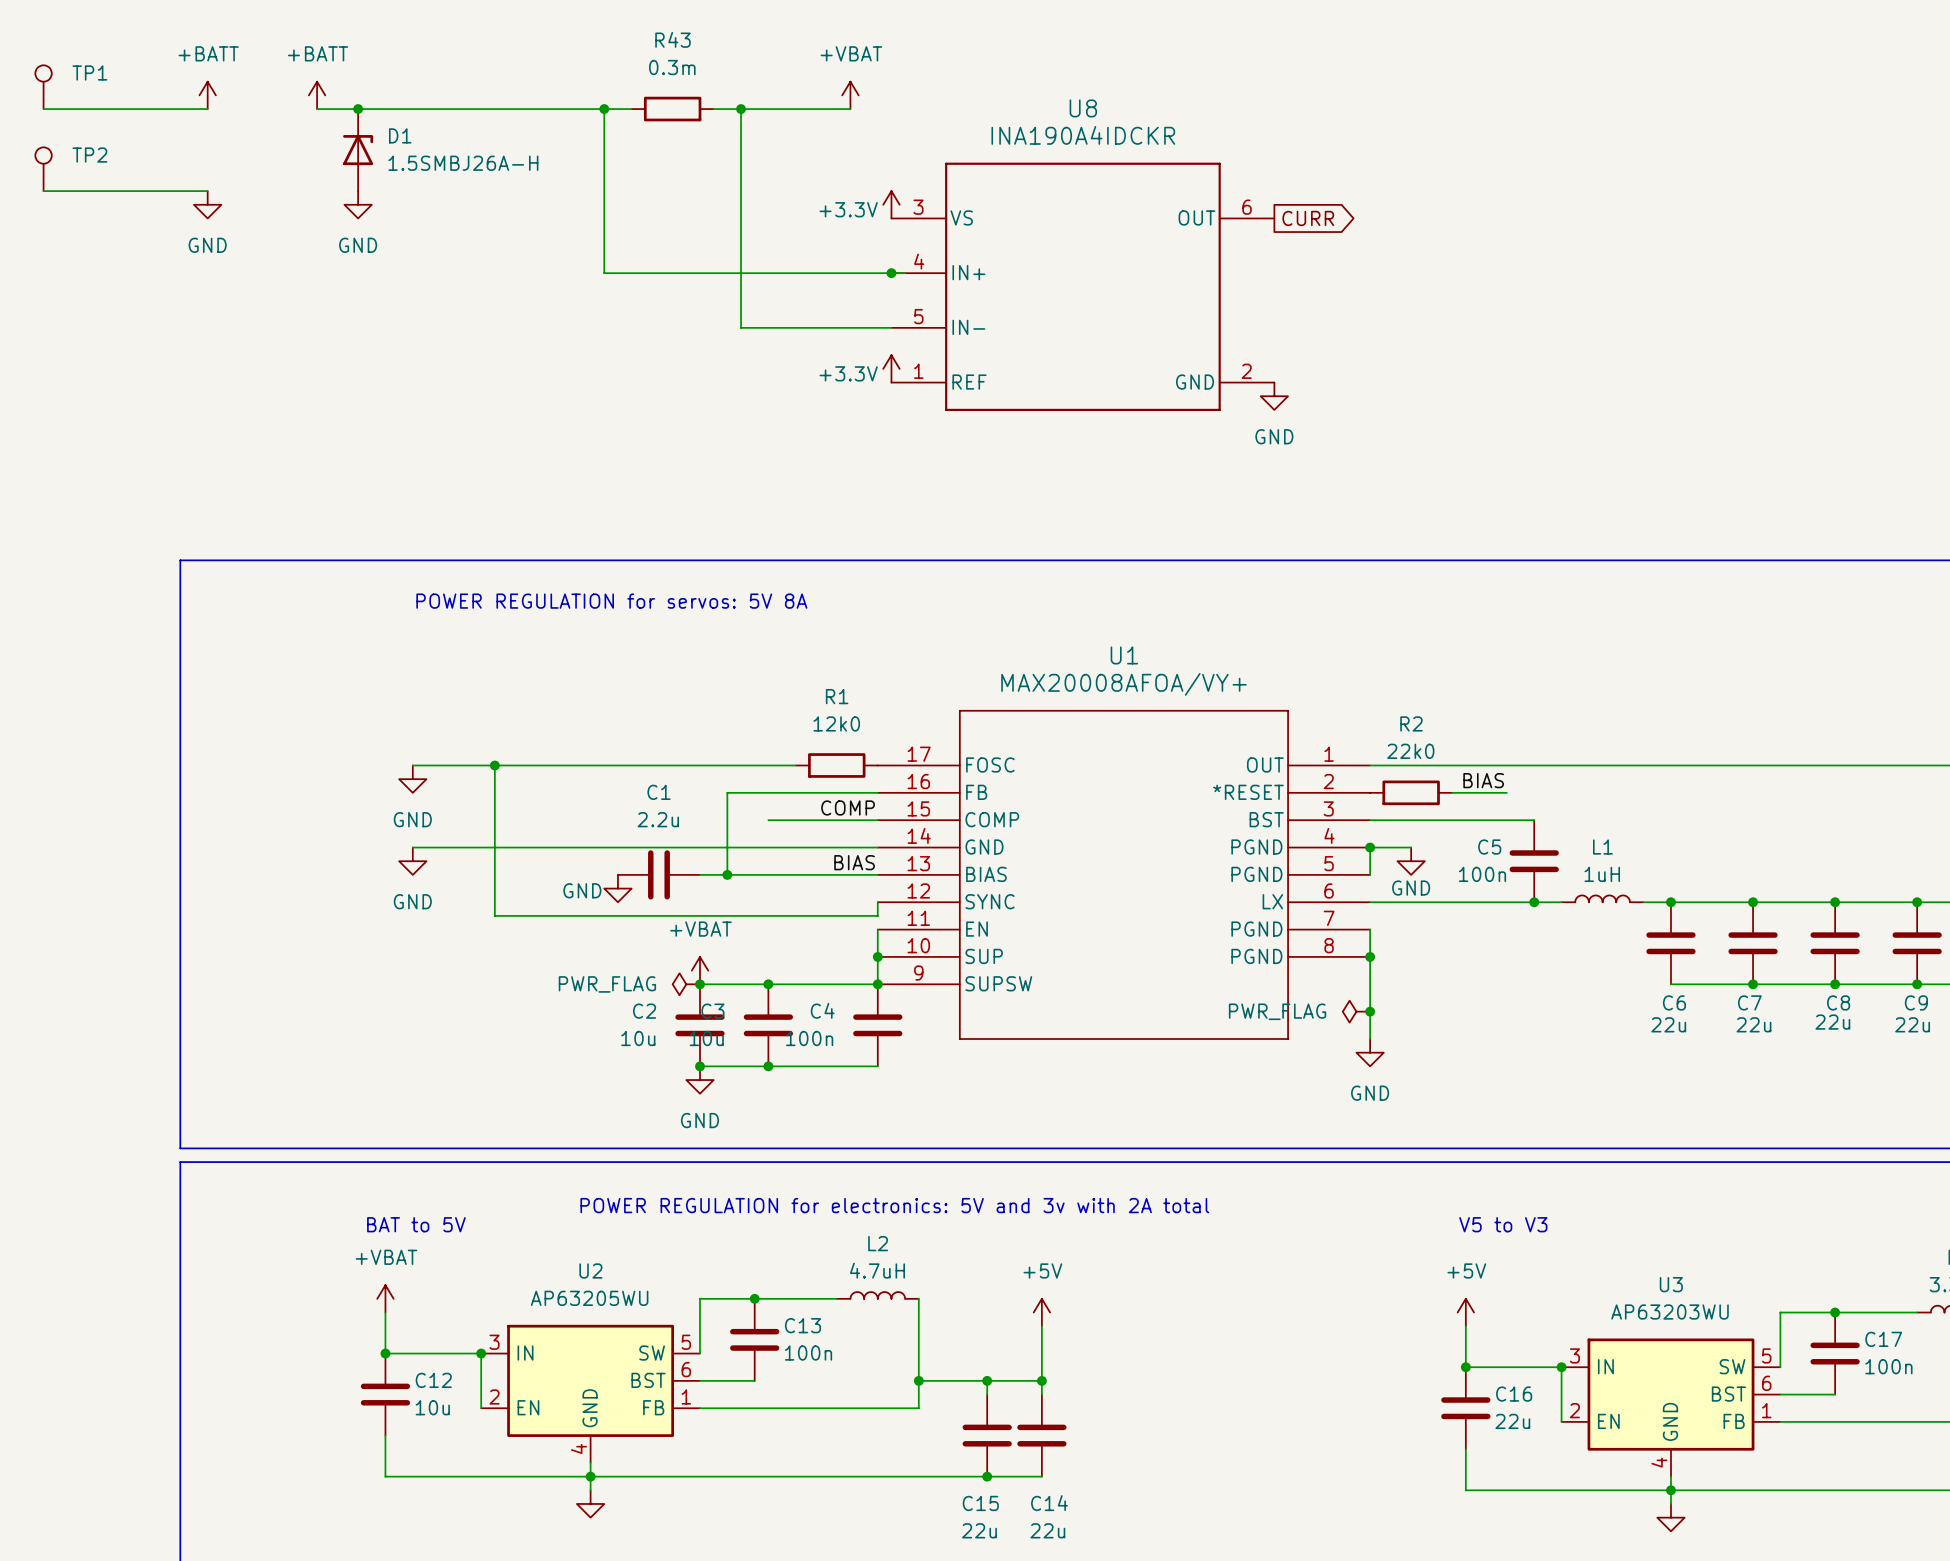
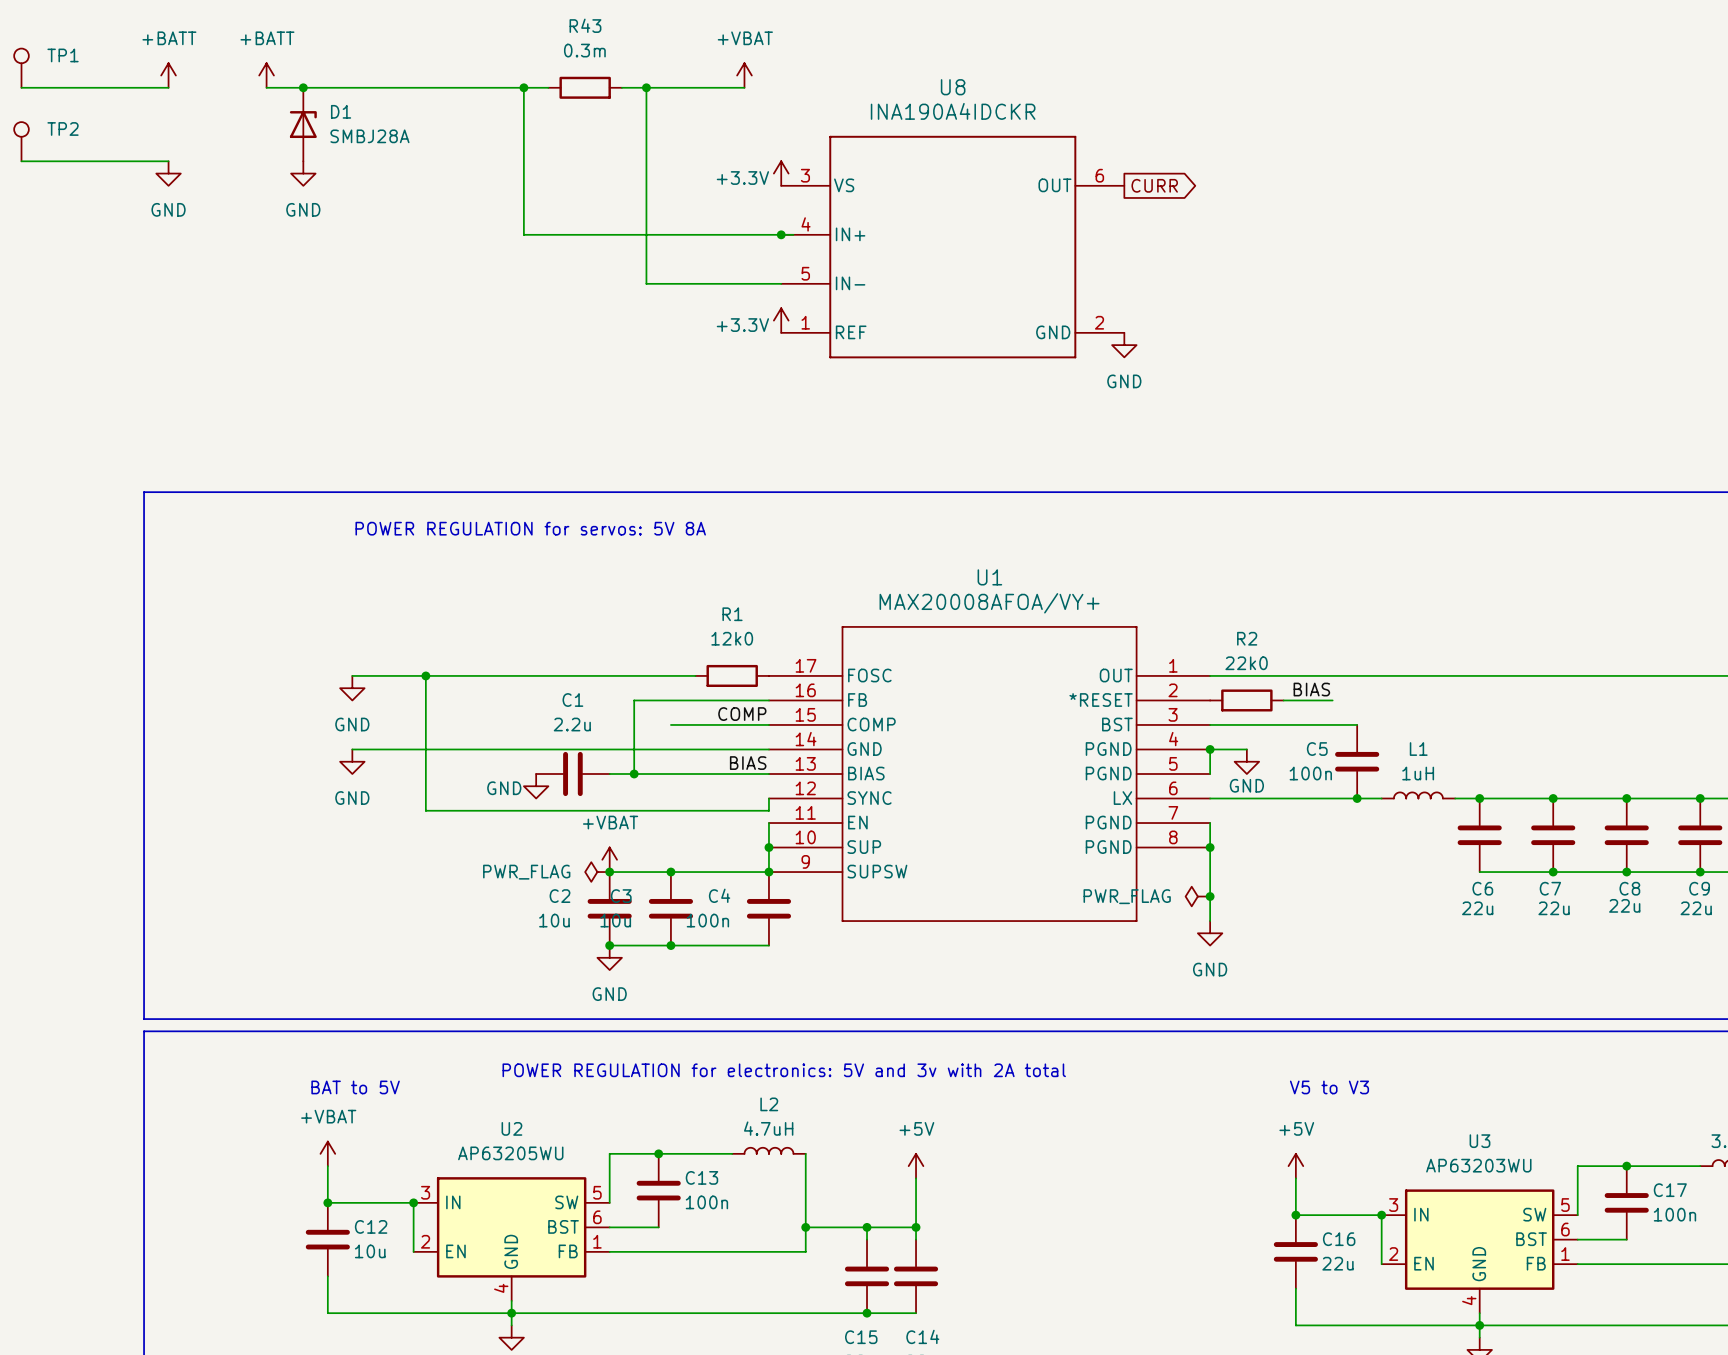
D1 value: 1.5SMBJ26A-H (463, 163) -> SMBJ28A (369, 136)

